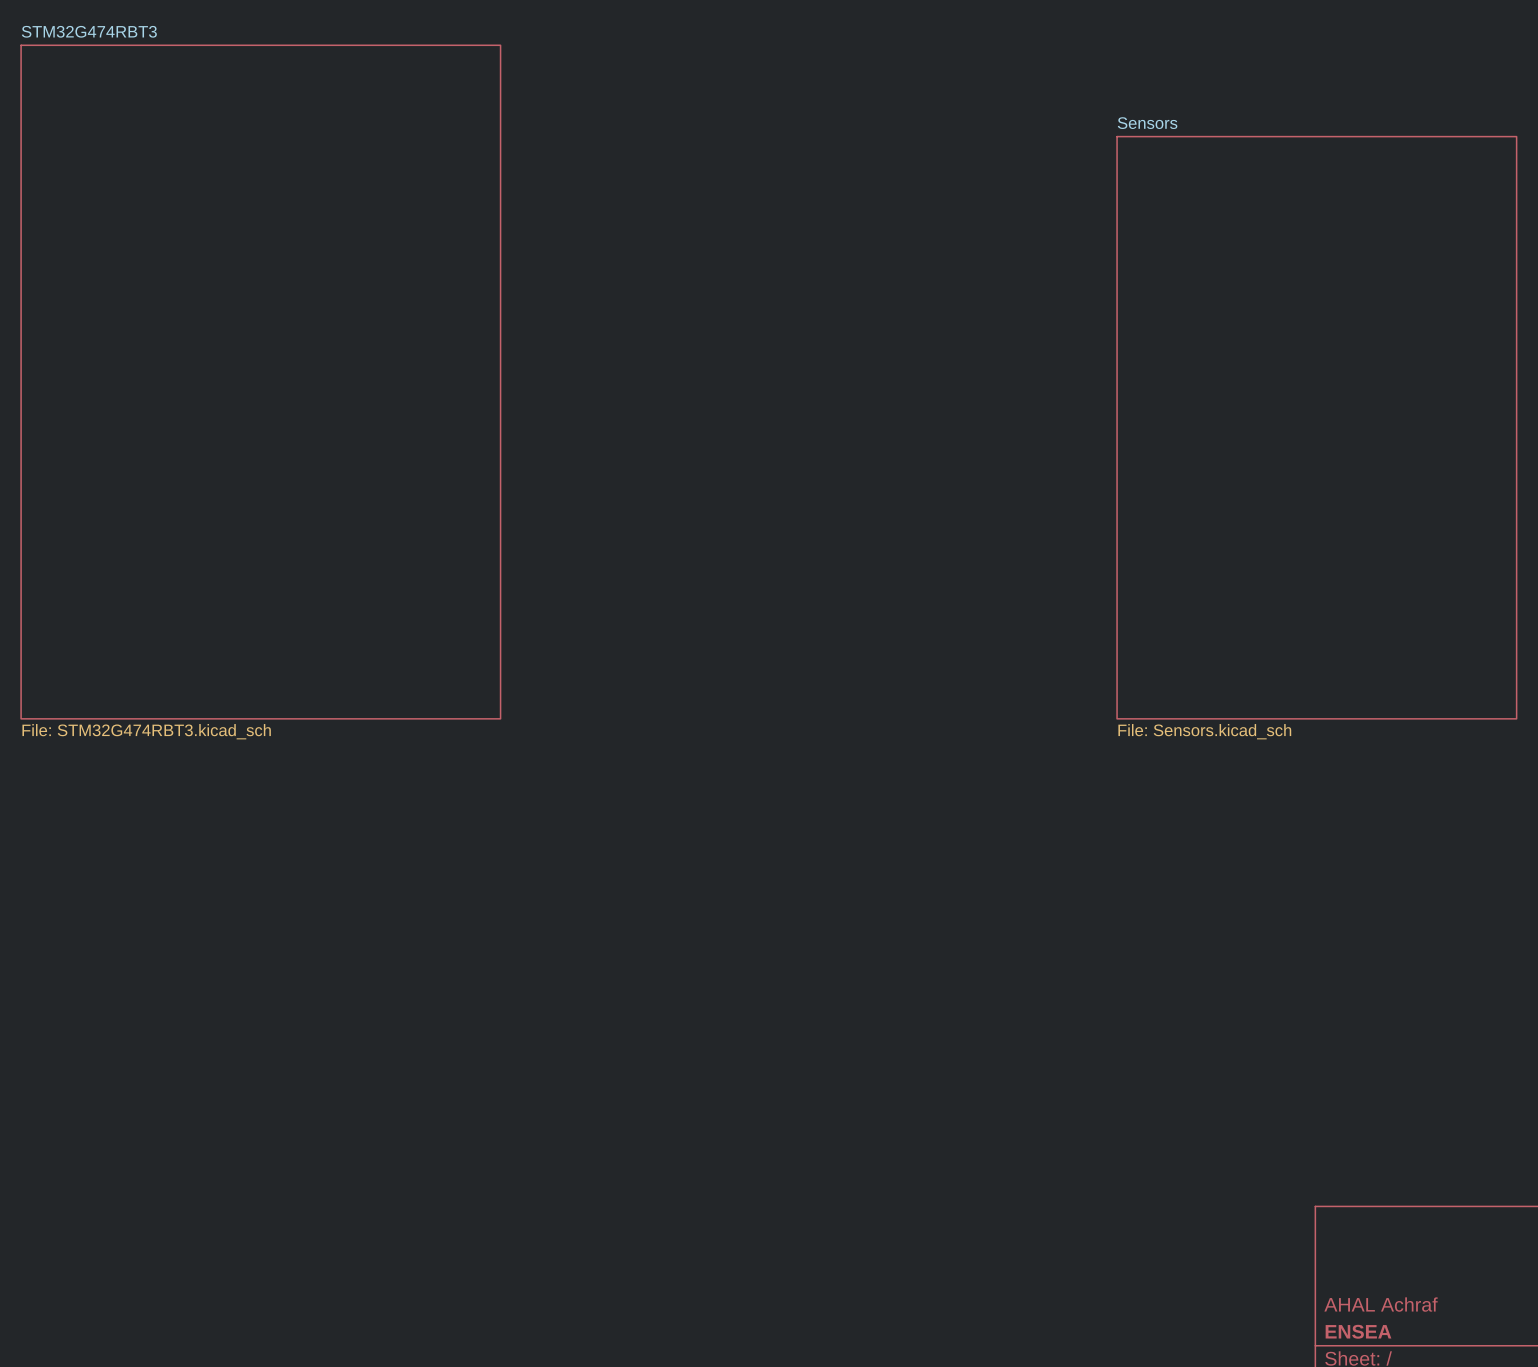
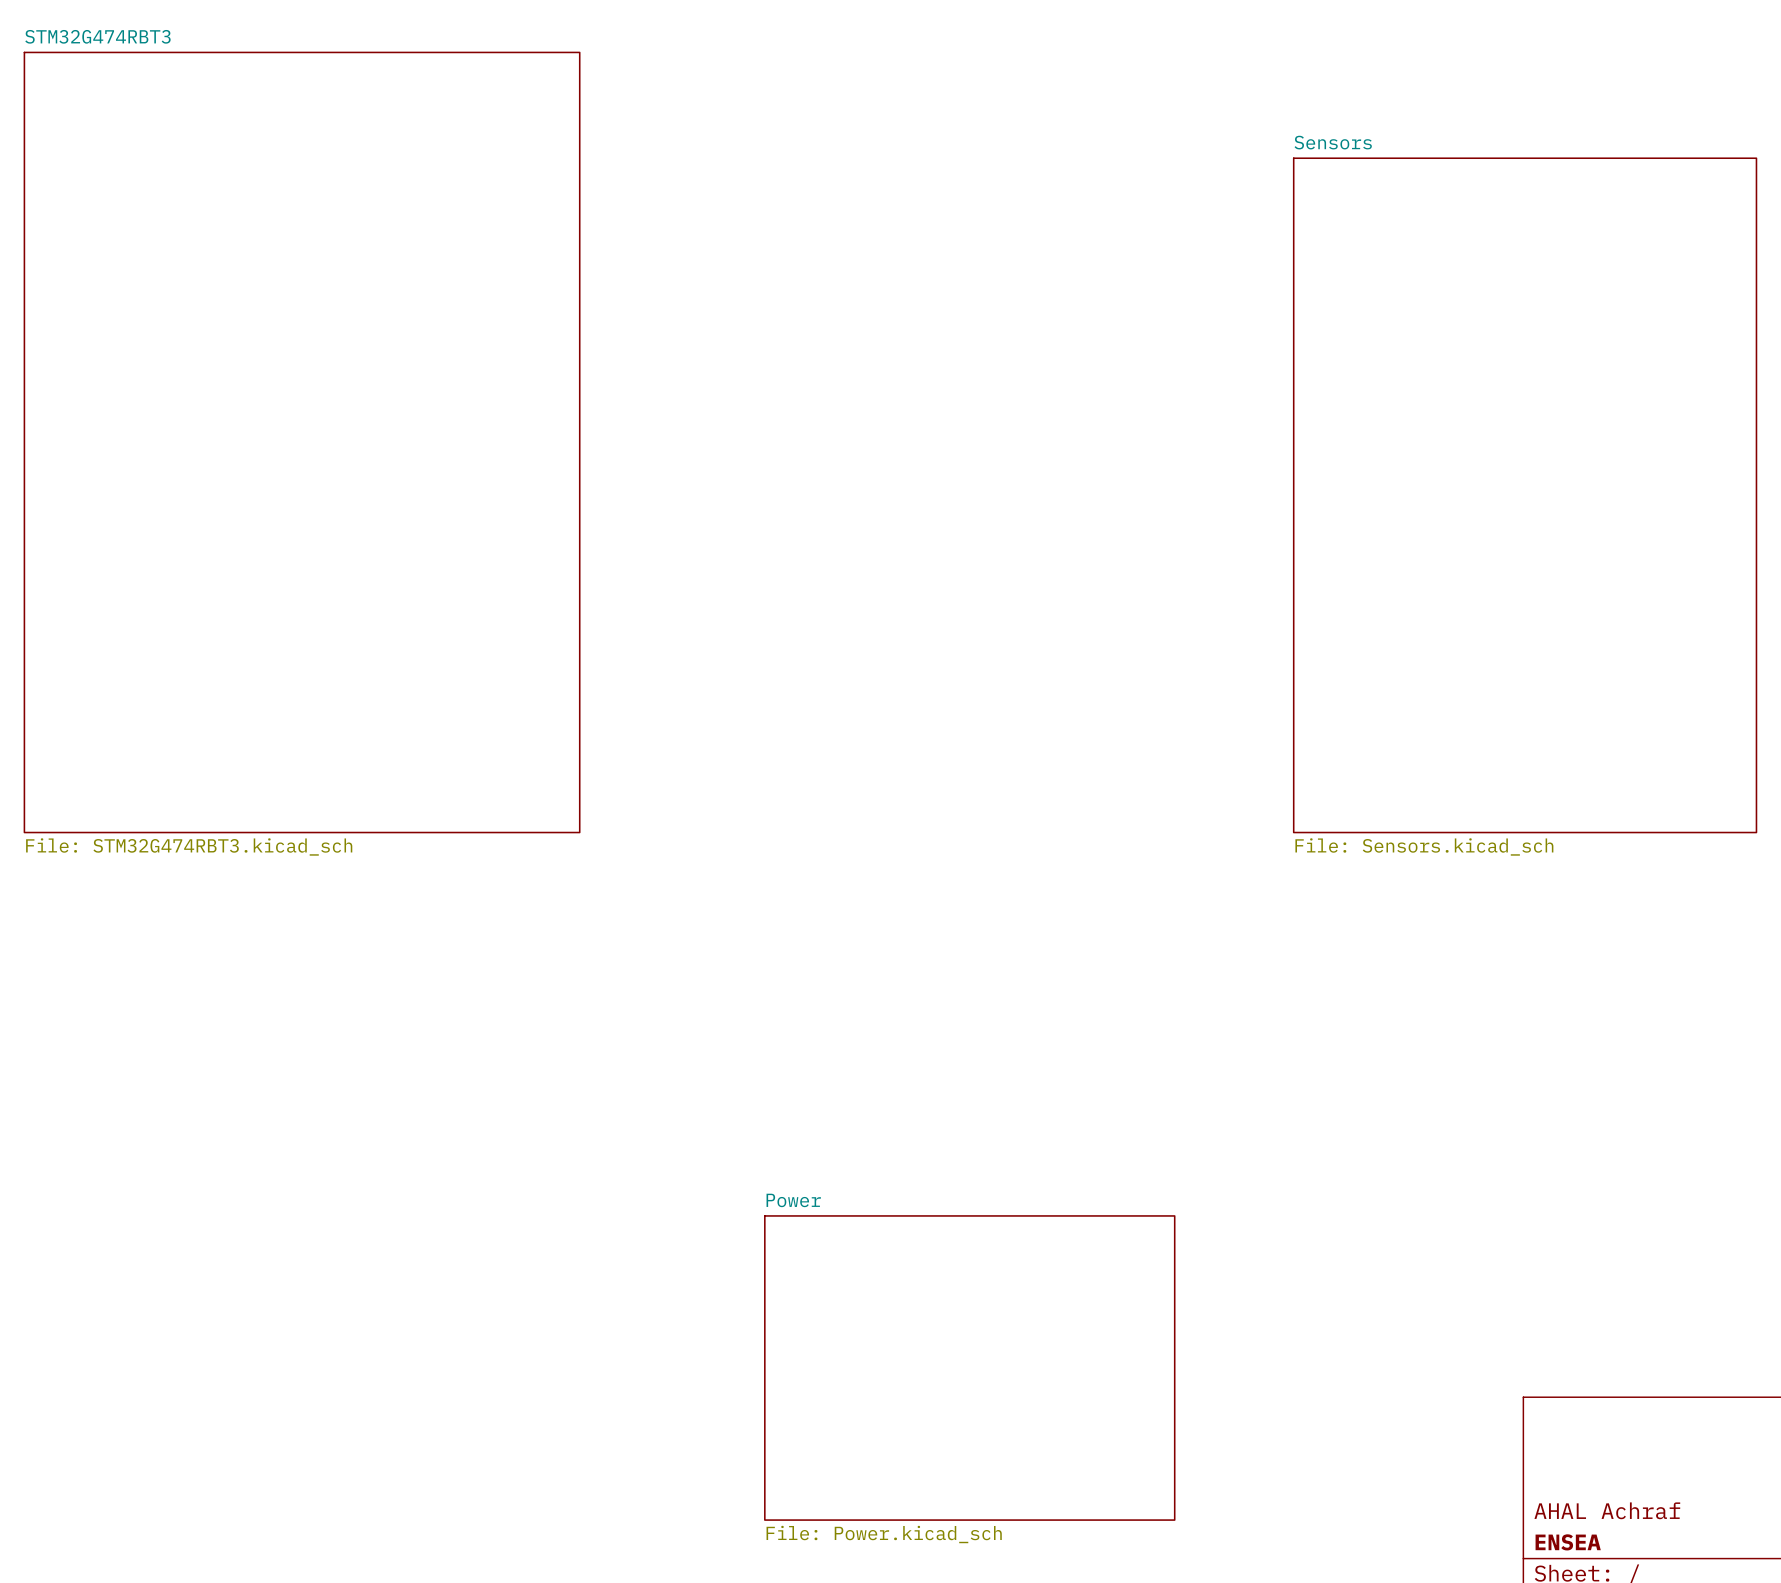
sheet Power: none -> File: Power.kicad_sch (969, 1368)

